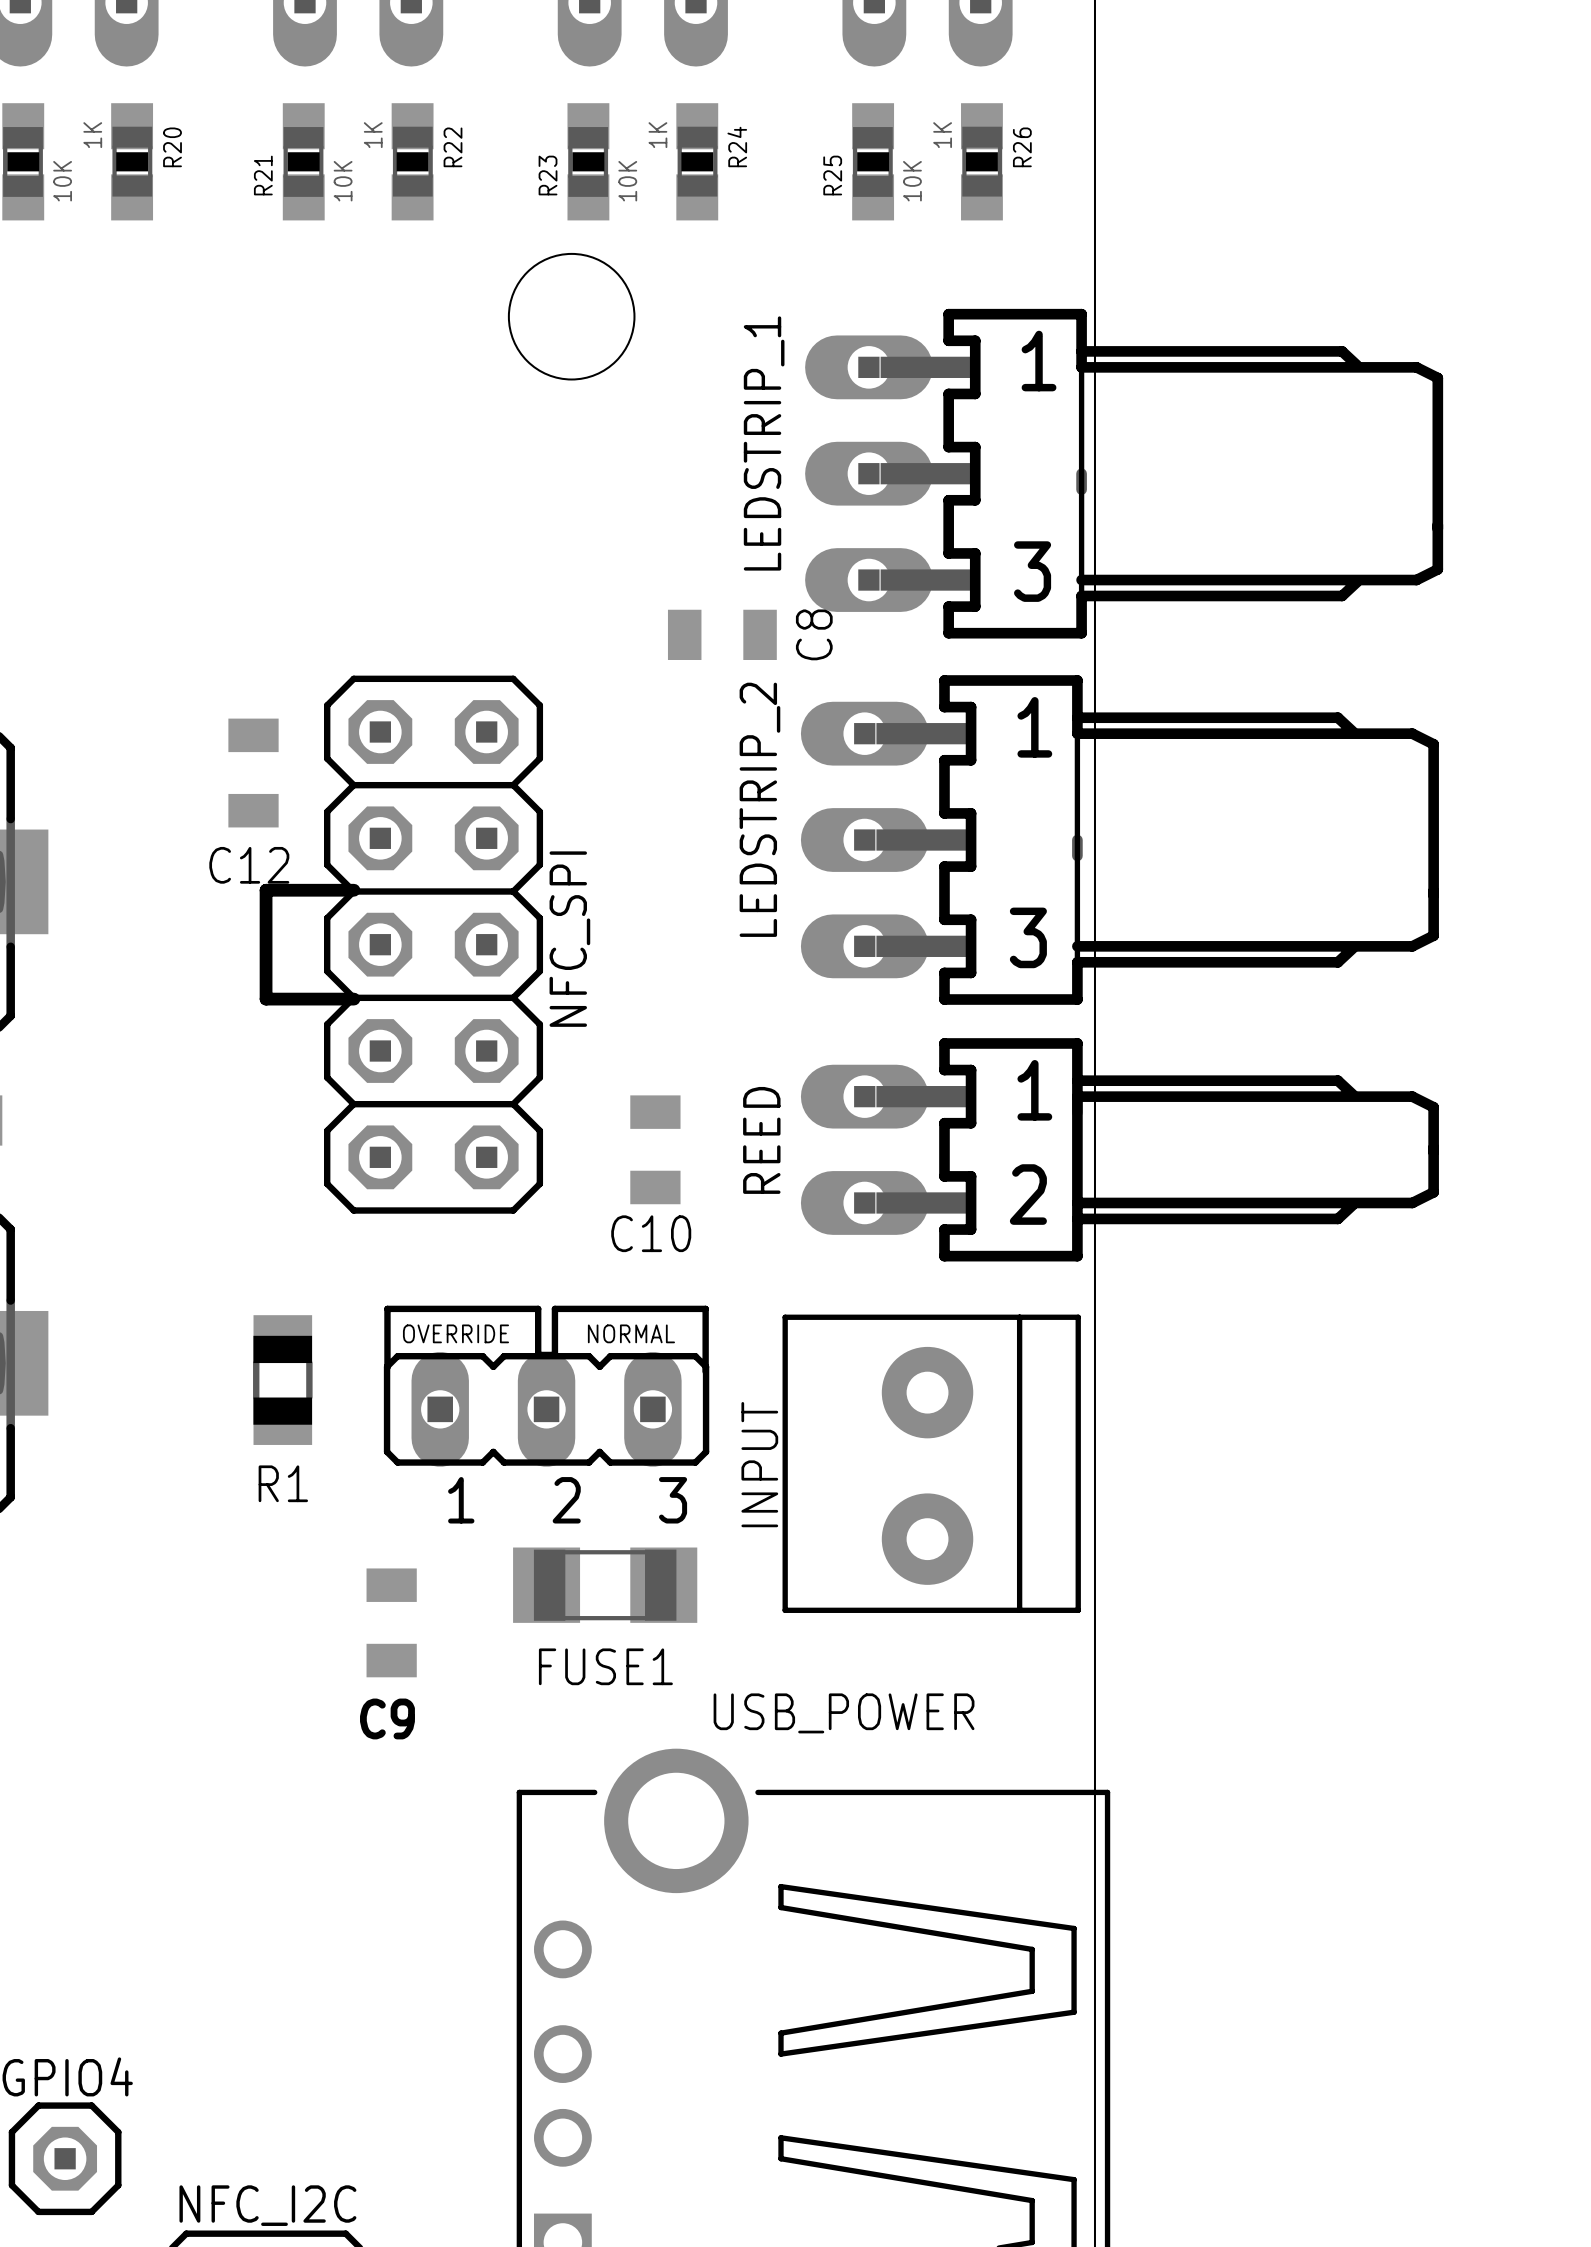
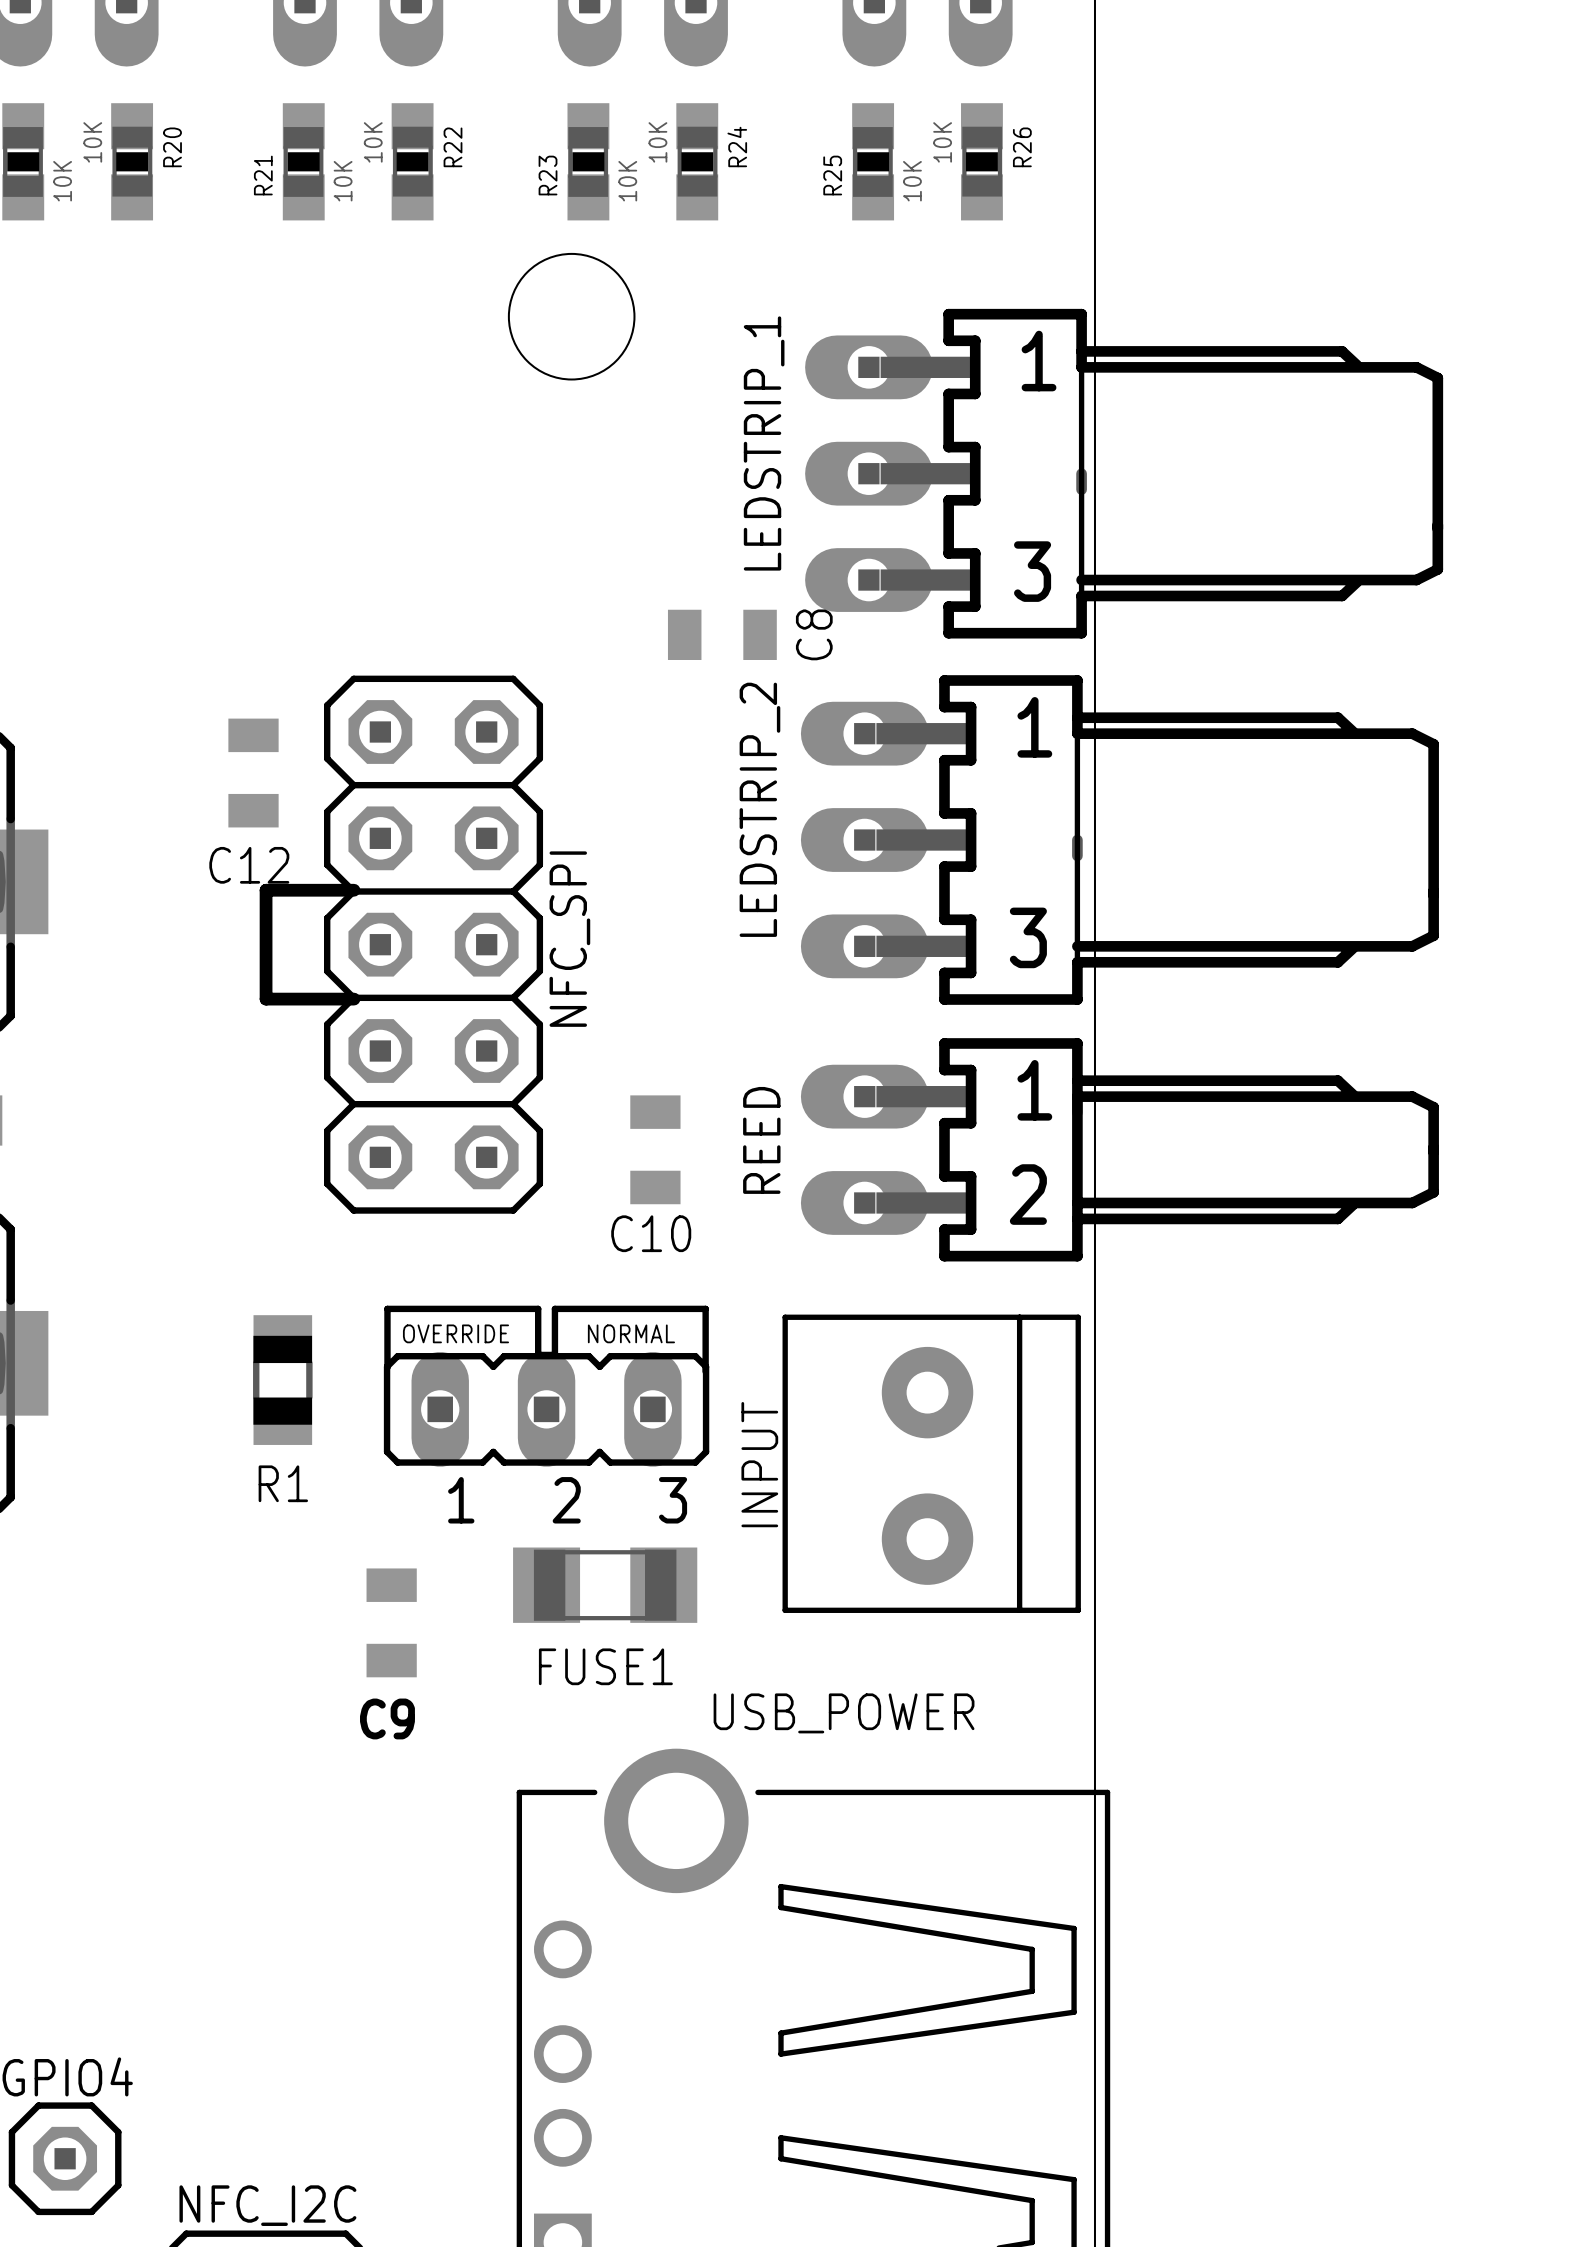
R20 value: 1K (92, 135) -> 10K (92, 142)
R22 value: 1K (373, 135) -> 10K (373, 142)
R24 value: 1K (657, 135) -> 10K (657, 142)
R26 value: 1K (942, 135) -> 10K (942, 142)

